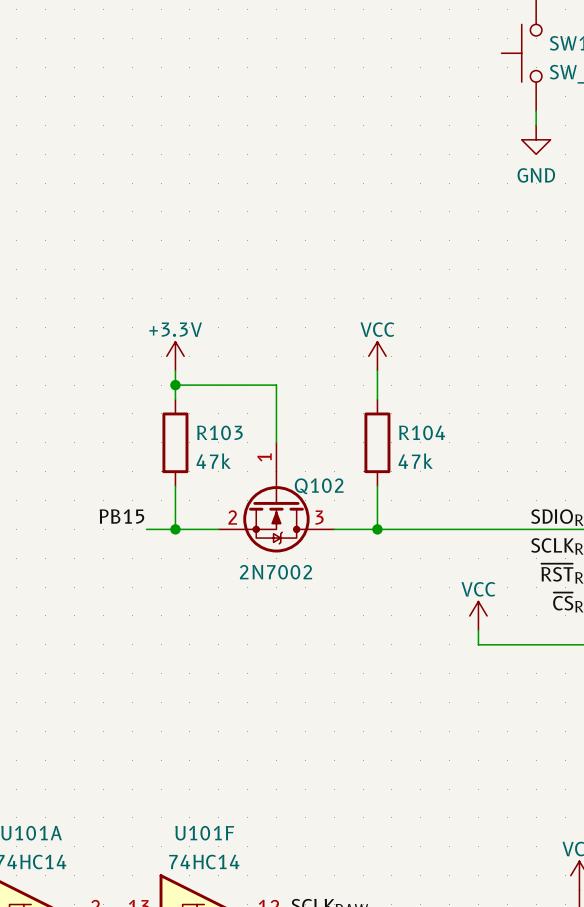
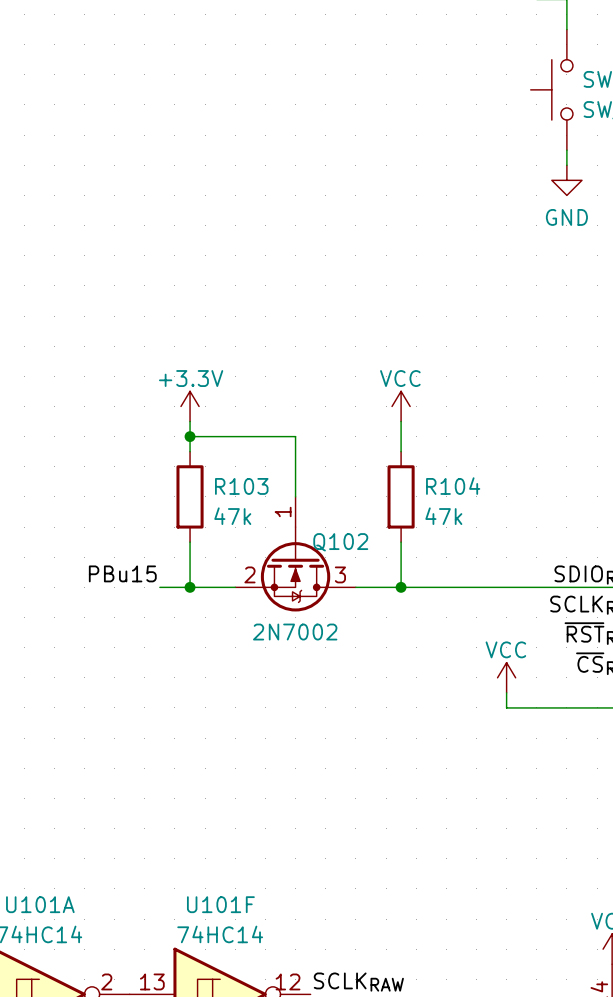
label: PB15 (121, 516) -> PBu15 (122, 573)

